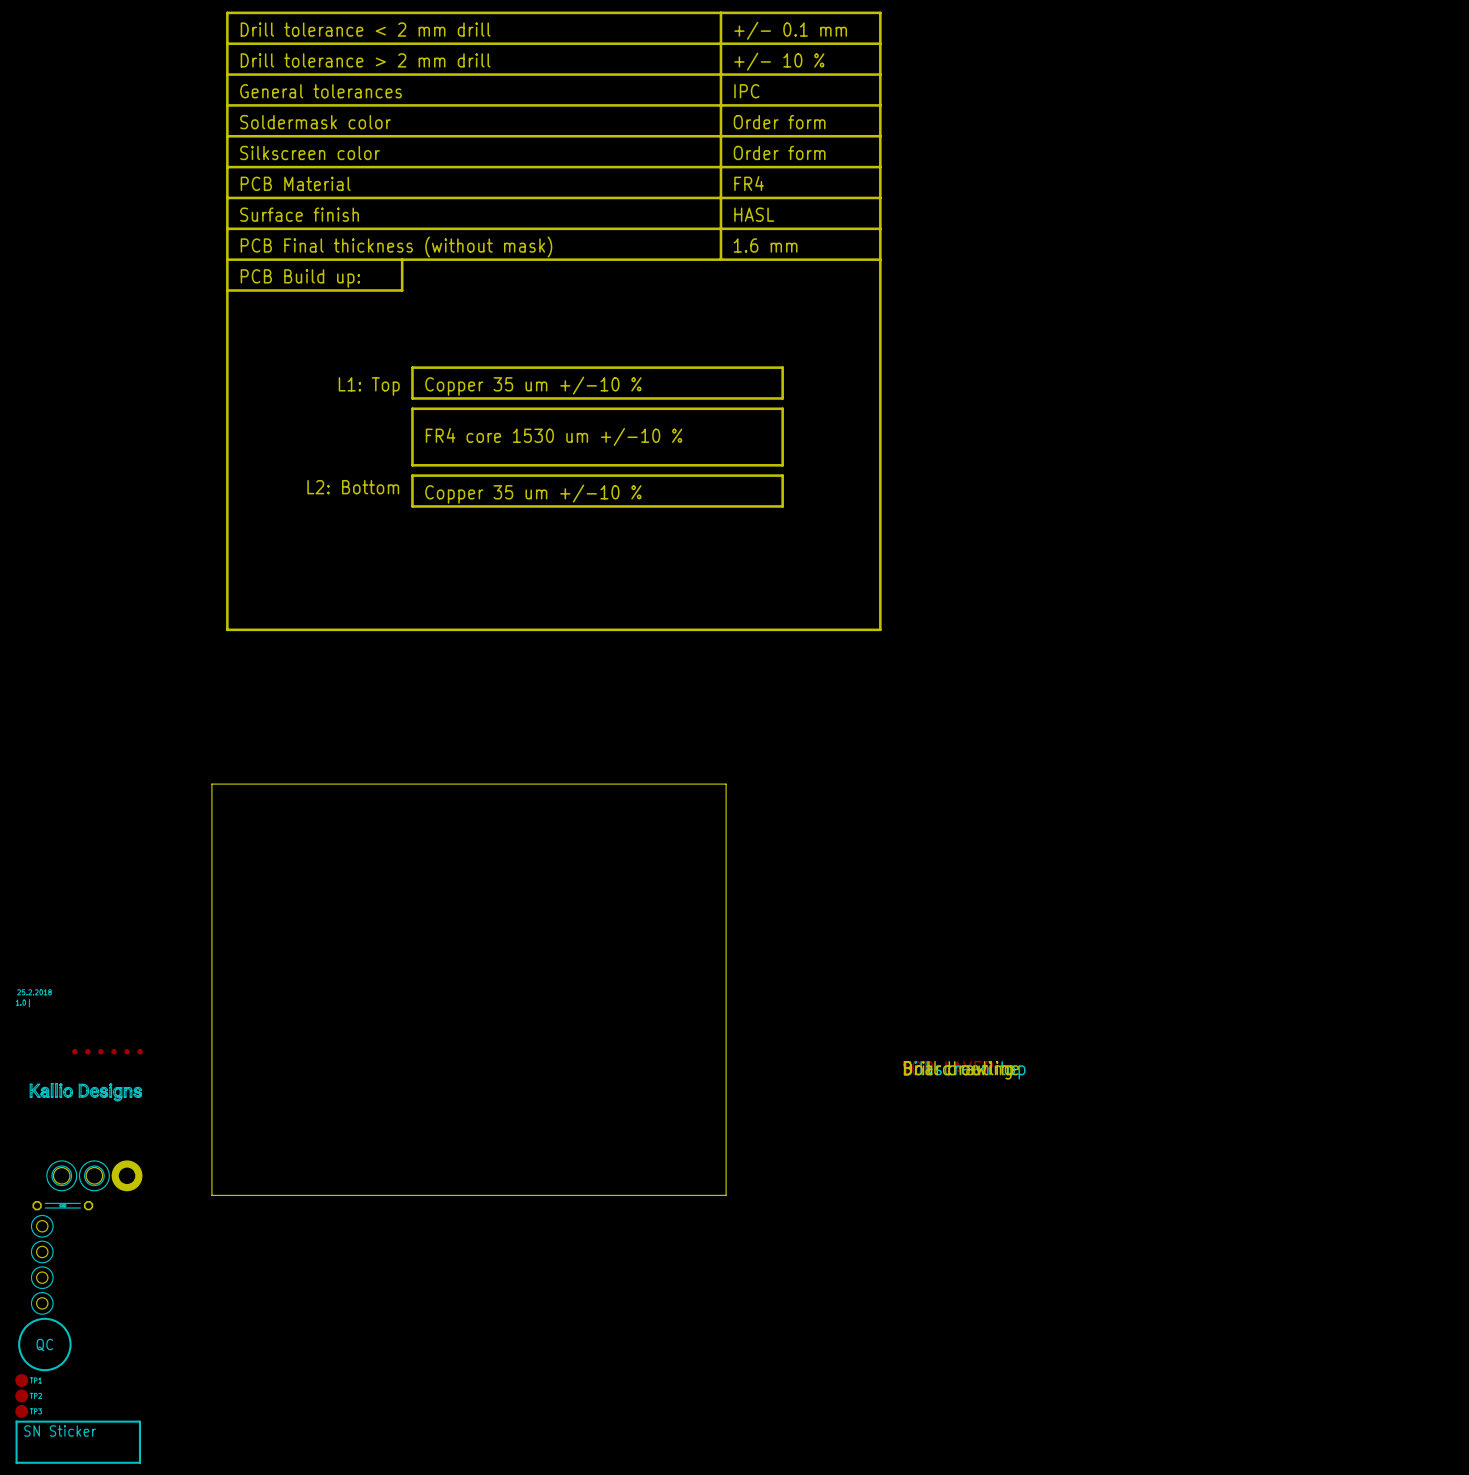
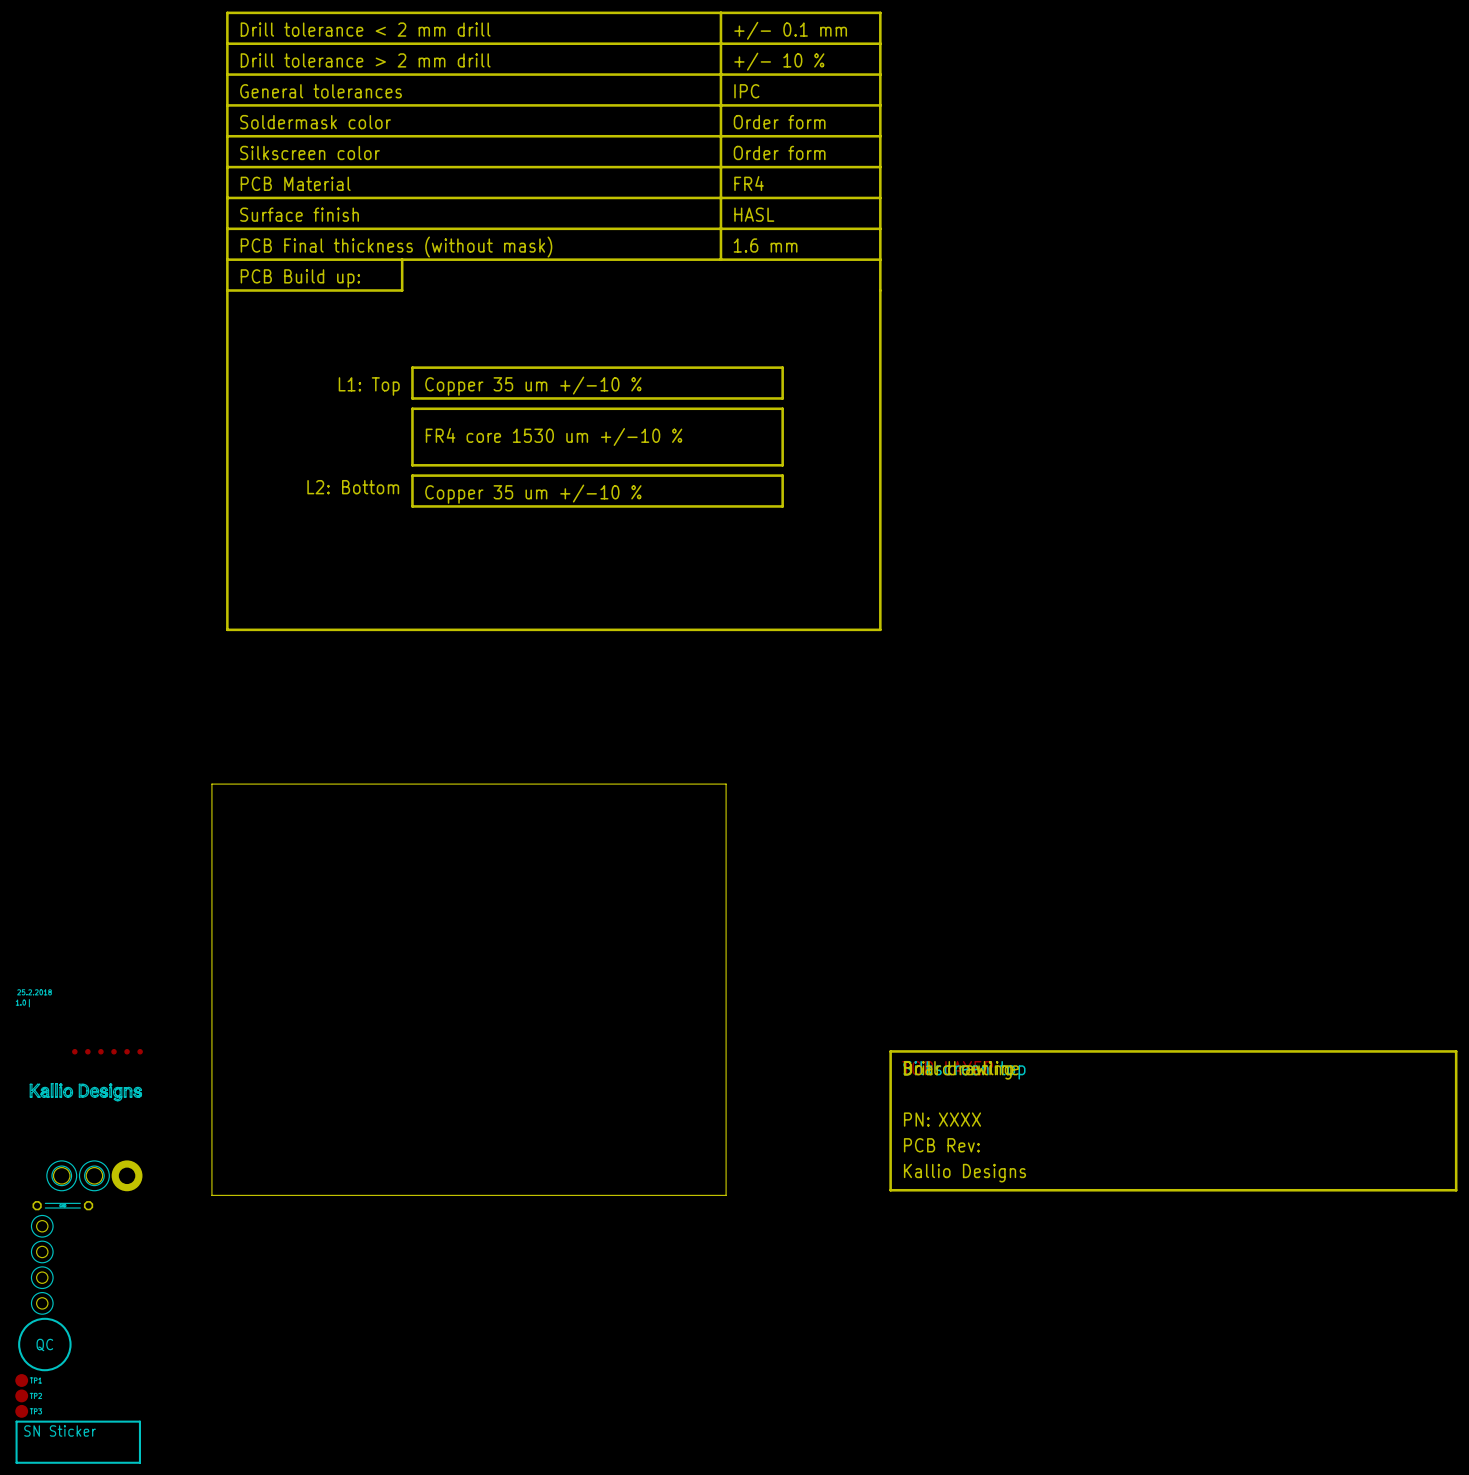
board edge: none -> (890, 1051) (1456, 1051) (1456, 1190) (890, 1190) (890, 1051)
text: none -> PN: (916, 1119)
text: none -> XXXX (959, 1119)
text: none -> PCB Rev: (941, 1145)
text: none -> Kallio Designs (964, 1173)

